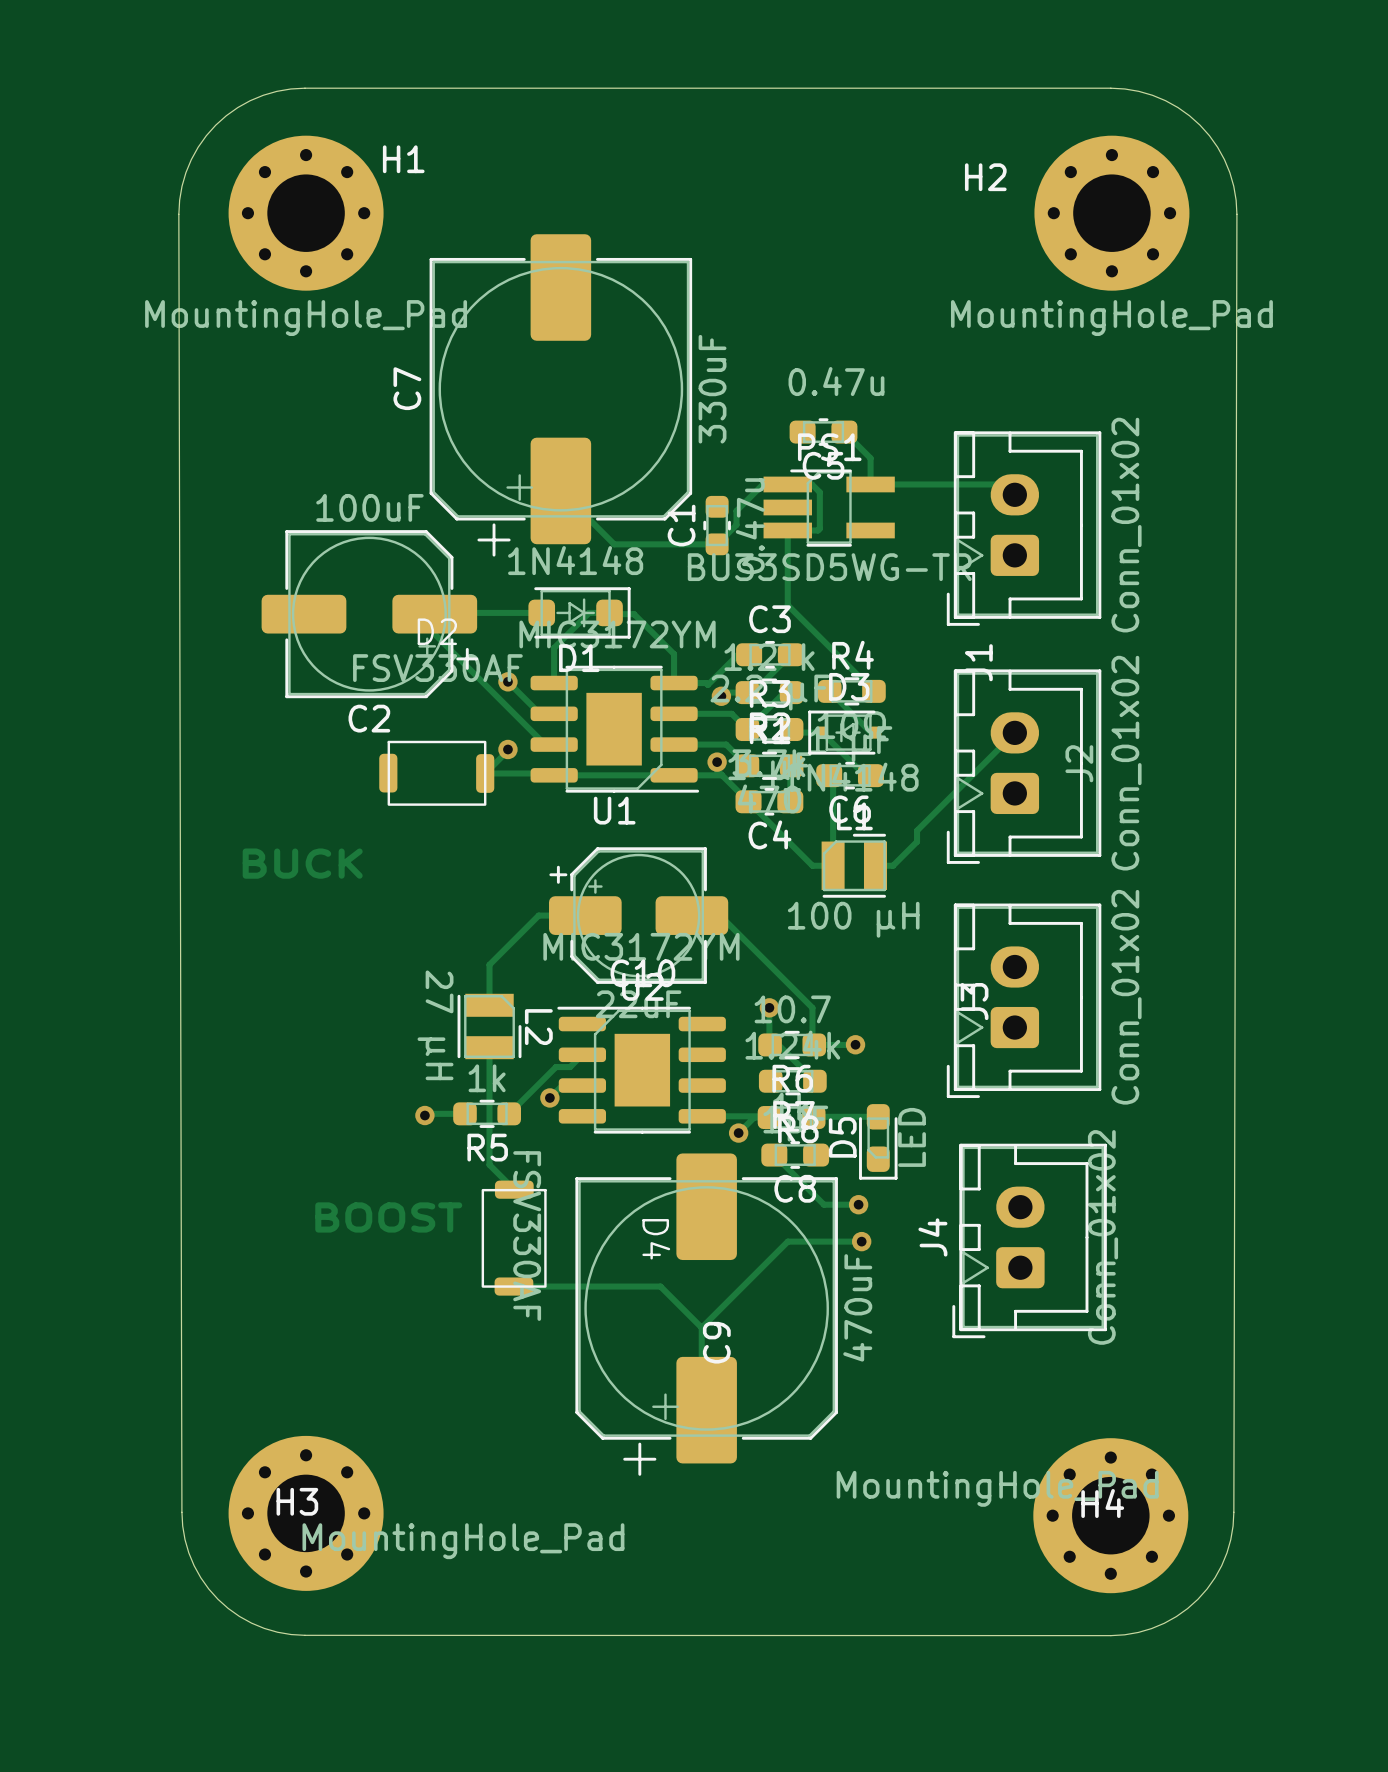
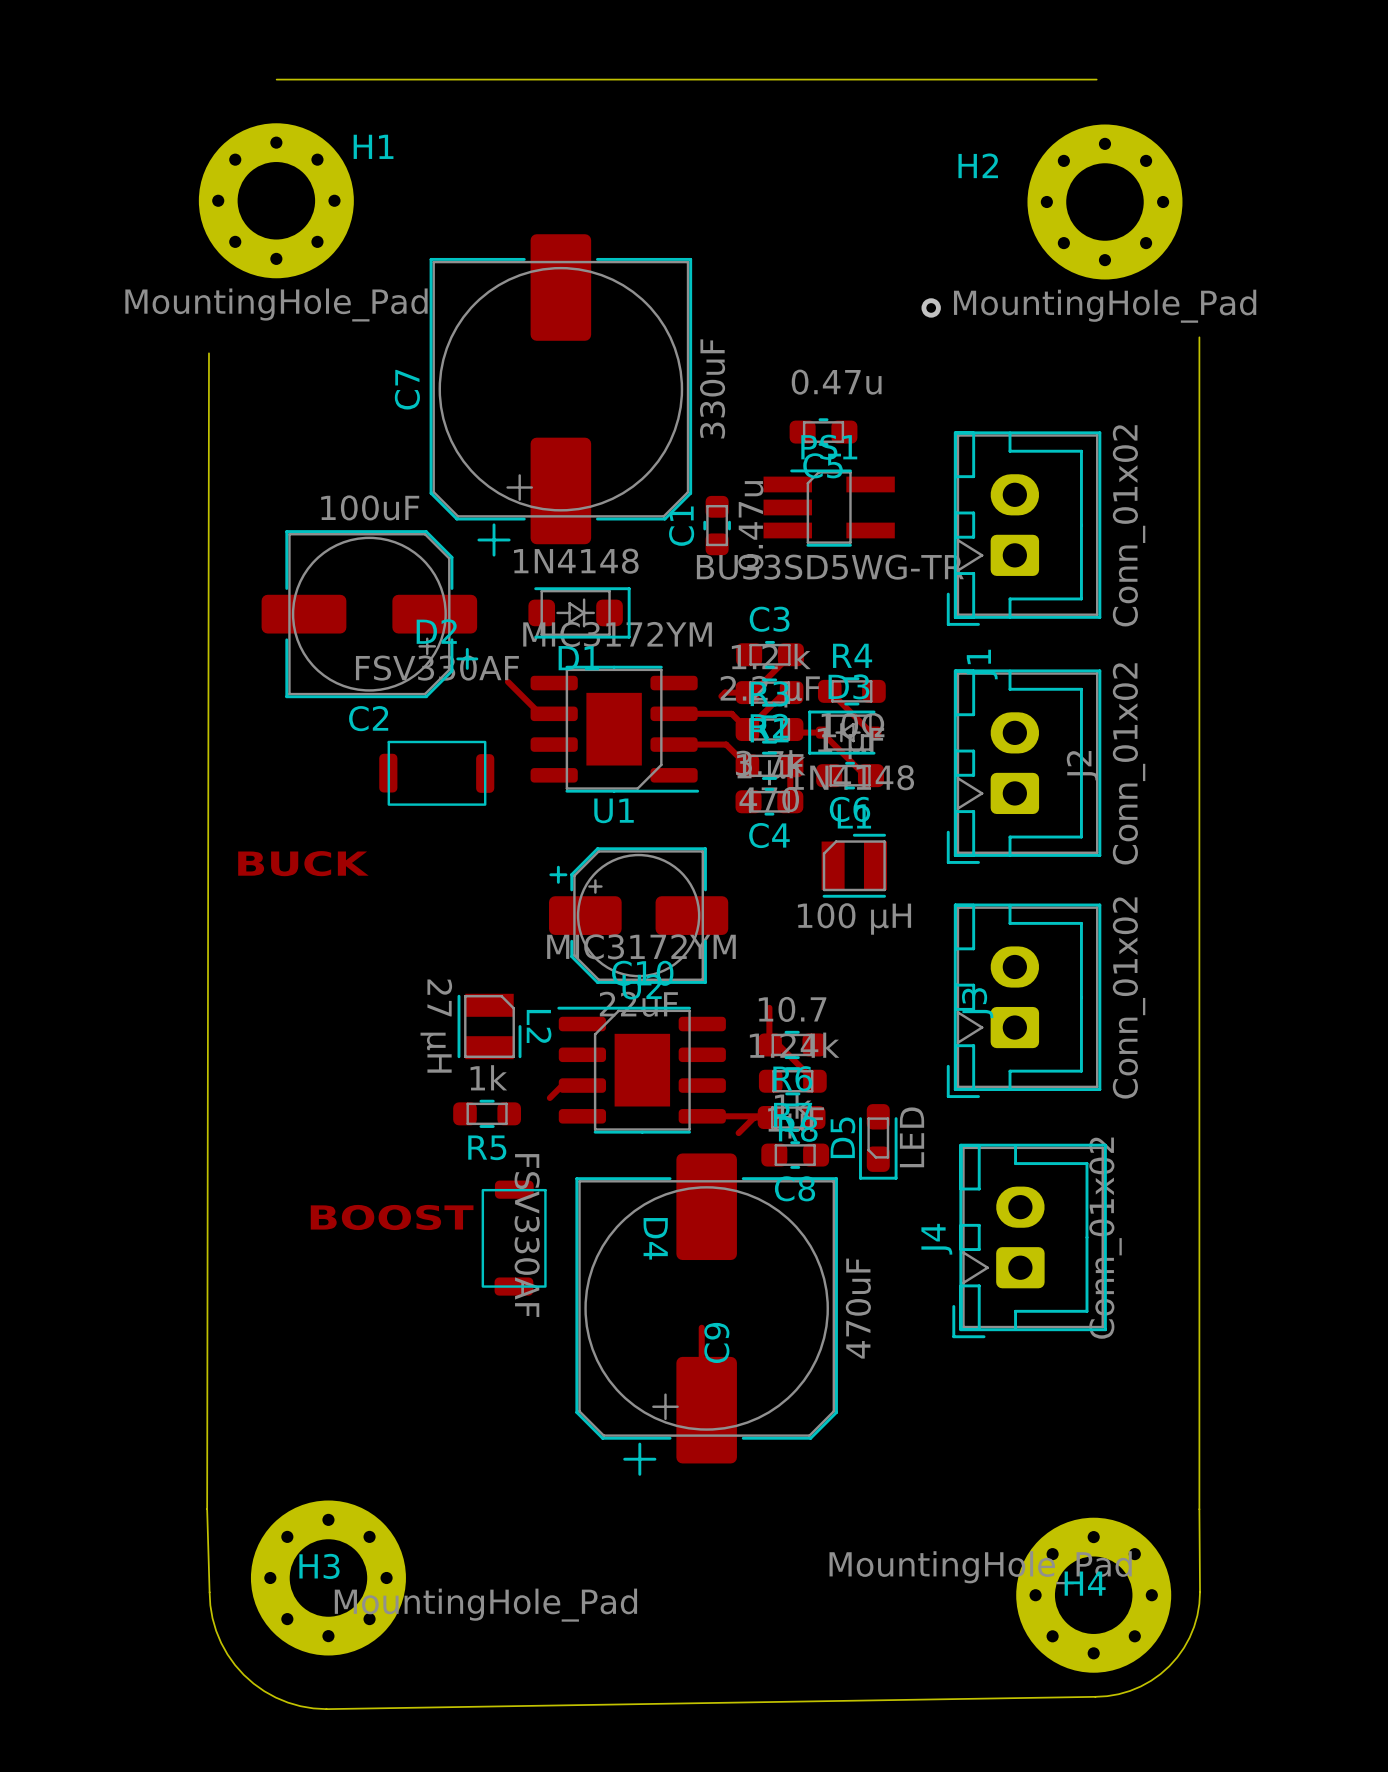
board edge: none -> (276, 79) (1096, 79)
board edge: (304, 88) (1124, 88) (1152, 95) (1177, 107) (1199, 125) (1217, 147) (1229, 172) (1233, 186) (1236, 214) (1233, 1512) (1230, 1539) (1226, 1552) (1215, 1577) (1197, 1599) (1176, 1616) (1151, 1628) (1138, 1632) (1110, 1635) (304, 1635) (277, 1632) (251, 1623) (228, 1608) (208, 1589) (200, 1577) (194, 1565) (185, 1539) (181, 1512) (179, 200) (182, 186) (191, 159) (206, 135) (215, 125) (237, 107) (250, 100) (276, 91) (304, 88) -> none
H1 position: (306, 213) -> (276, 200)
H2 position: (1111, 213) -> (1104, 202)
via: none -> (931, 307)
board edge: none -> (1199, 337) (1199, 1603) (1194, 1626) (1183, 1647) (1160, 1674) (1129, 1690) (1095, 1696) (326, 1709) (300, 1706) (264, 1691) (243, 1674) (227, 1654) (216, 1630) (210, 1605) (207, 1509) (208, 353)
track: (844, 432) (870, 458) (870, 484) (1004, 484) (1014, 494) -> none
track: (560, 490) (614, 544) (717, 544) (736, 524) (736, 510) (762, 484) (811, 484) (819, 492) (819, 528) (818, 530) (787, 530) (787, 605) (873, 691) -> none
track: (541, 612) (435, 612) (434, 634) (545, 744) (554, 744) -> none
track: (749, 654) (738, 654) (707, 684) (706, 683) (674, 683) (674, 654) (634, 614) (589, 612) (554, 647) (554, 682) -> none
via: (507, 681) -> none
via: (721, 696) -> none
track: (1014, 732) (917, 830) (917, 841) (893, 865) (875, 865) -> none
track: (507, 749) (485, 773) (722, 775) -> none
via: (507, 749) -> none
track: (717, 762) (717, 770) (812, 865) (833, 865) (833, 779) (829, 775) -> none
via: (717, 762) -> none
track: (585, 915) (538, 915) (489, 964) (489, 1005) -> none
track: (691, 915) (720, 915) (812, 1007) (812, 1043) (814, 1044) (855, 1044) -> none
via: (769, 1007) -> none
via: (855, 1044) -> none
track: (489, 1047) (489, 1164) (514, 1189) -> none
track: (582, 1054) (570, 1067) (555, 1067) (509, 1113) -> none
via: (549, 1097) -> none
track: (464, 1113) (426, 1113) (424, 1115) -> none
via: (424, 1115) -> none
track: (878, 1116) (813, 1117) -> none
via: (738, 1133) -> none
track: (774, 1155) (823, 1204) (858, 1204) -> none
via: (858, 1204) -> none
track: (861, 1241) (787, 1241) (701, 1327) (660, 1286) (513, 1286) -> none
via: (861, 1241) -> none
H3 position: (306, 1513) -> (328, 1578)
H4 position: (1110, 1515) -> (1093, 1595)

